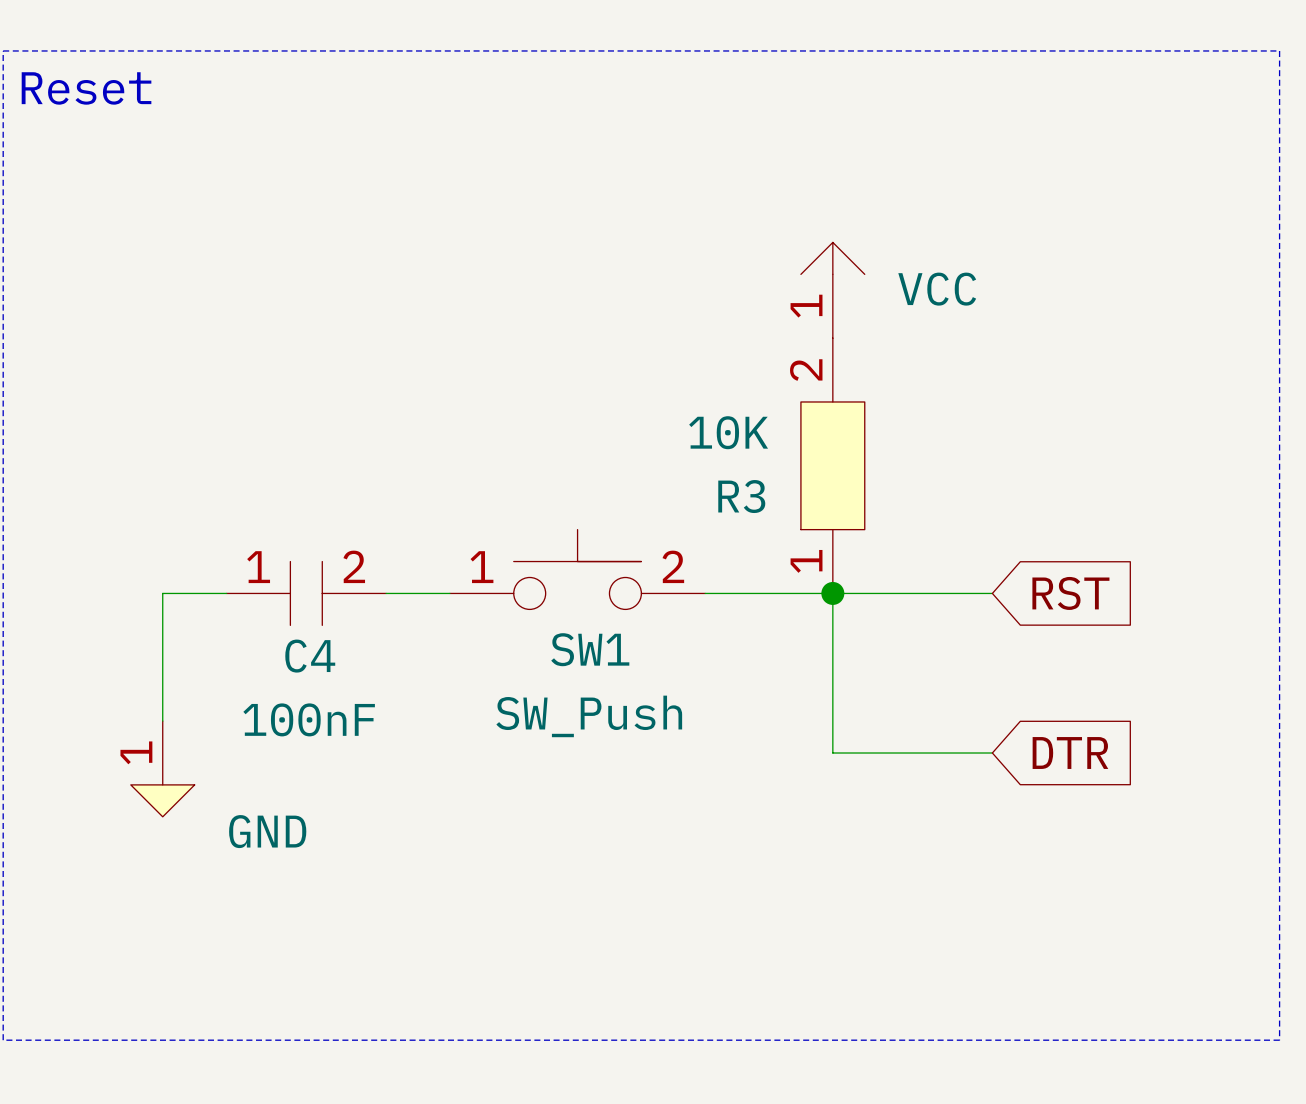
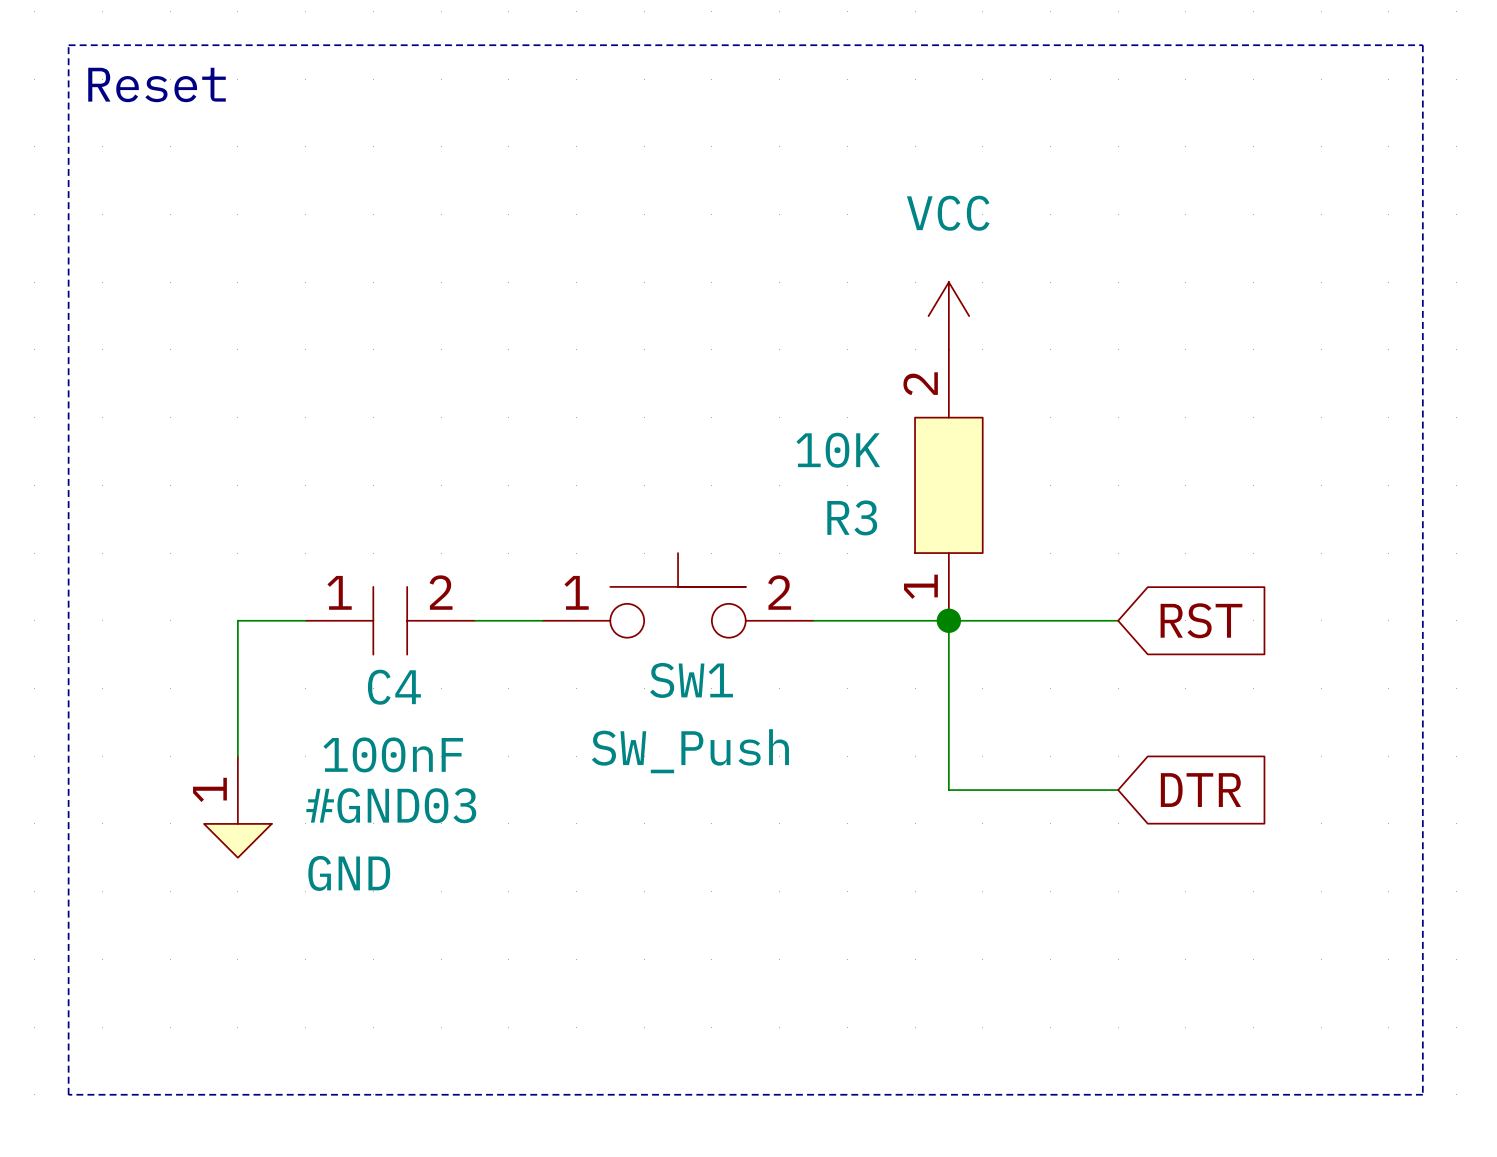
power symbol shape: [800, 242, 865, 339] -> [928, 282, 970, 350]
power symbol text position: VCC (937, 289) -> VCC (948, 213)
#GND03 name: none -> #GND03 (391, 805)

